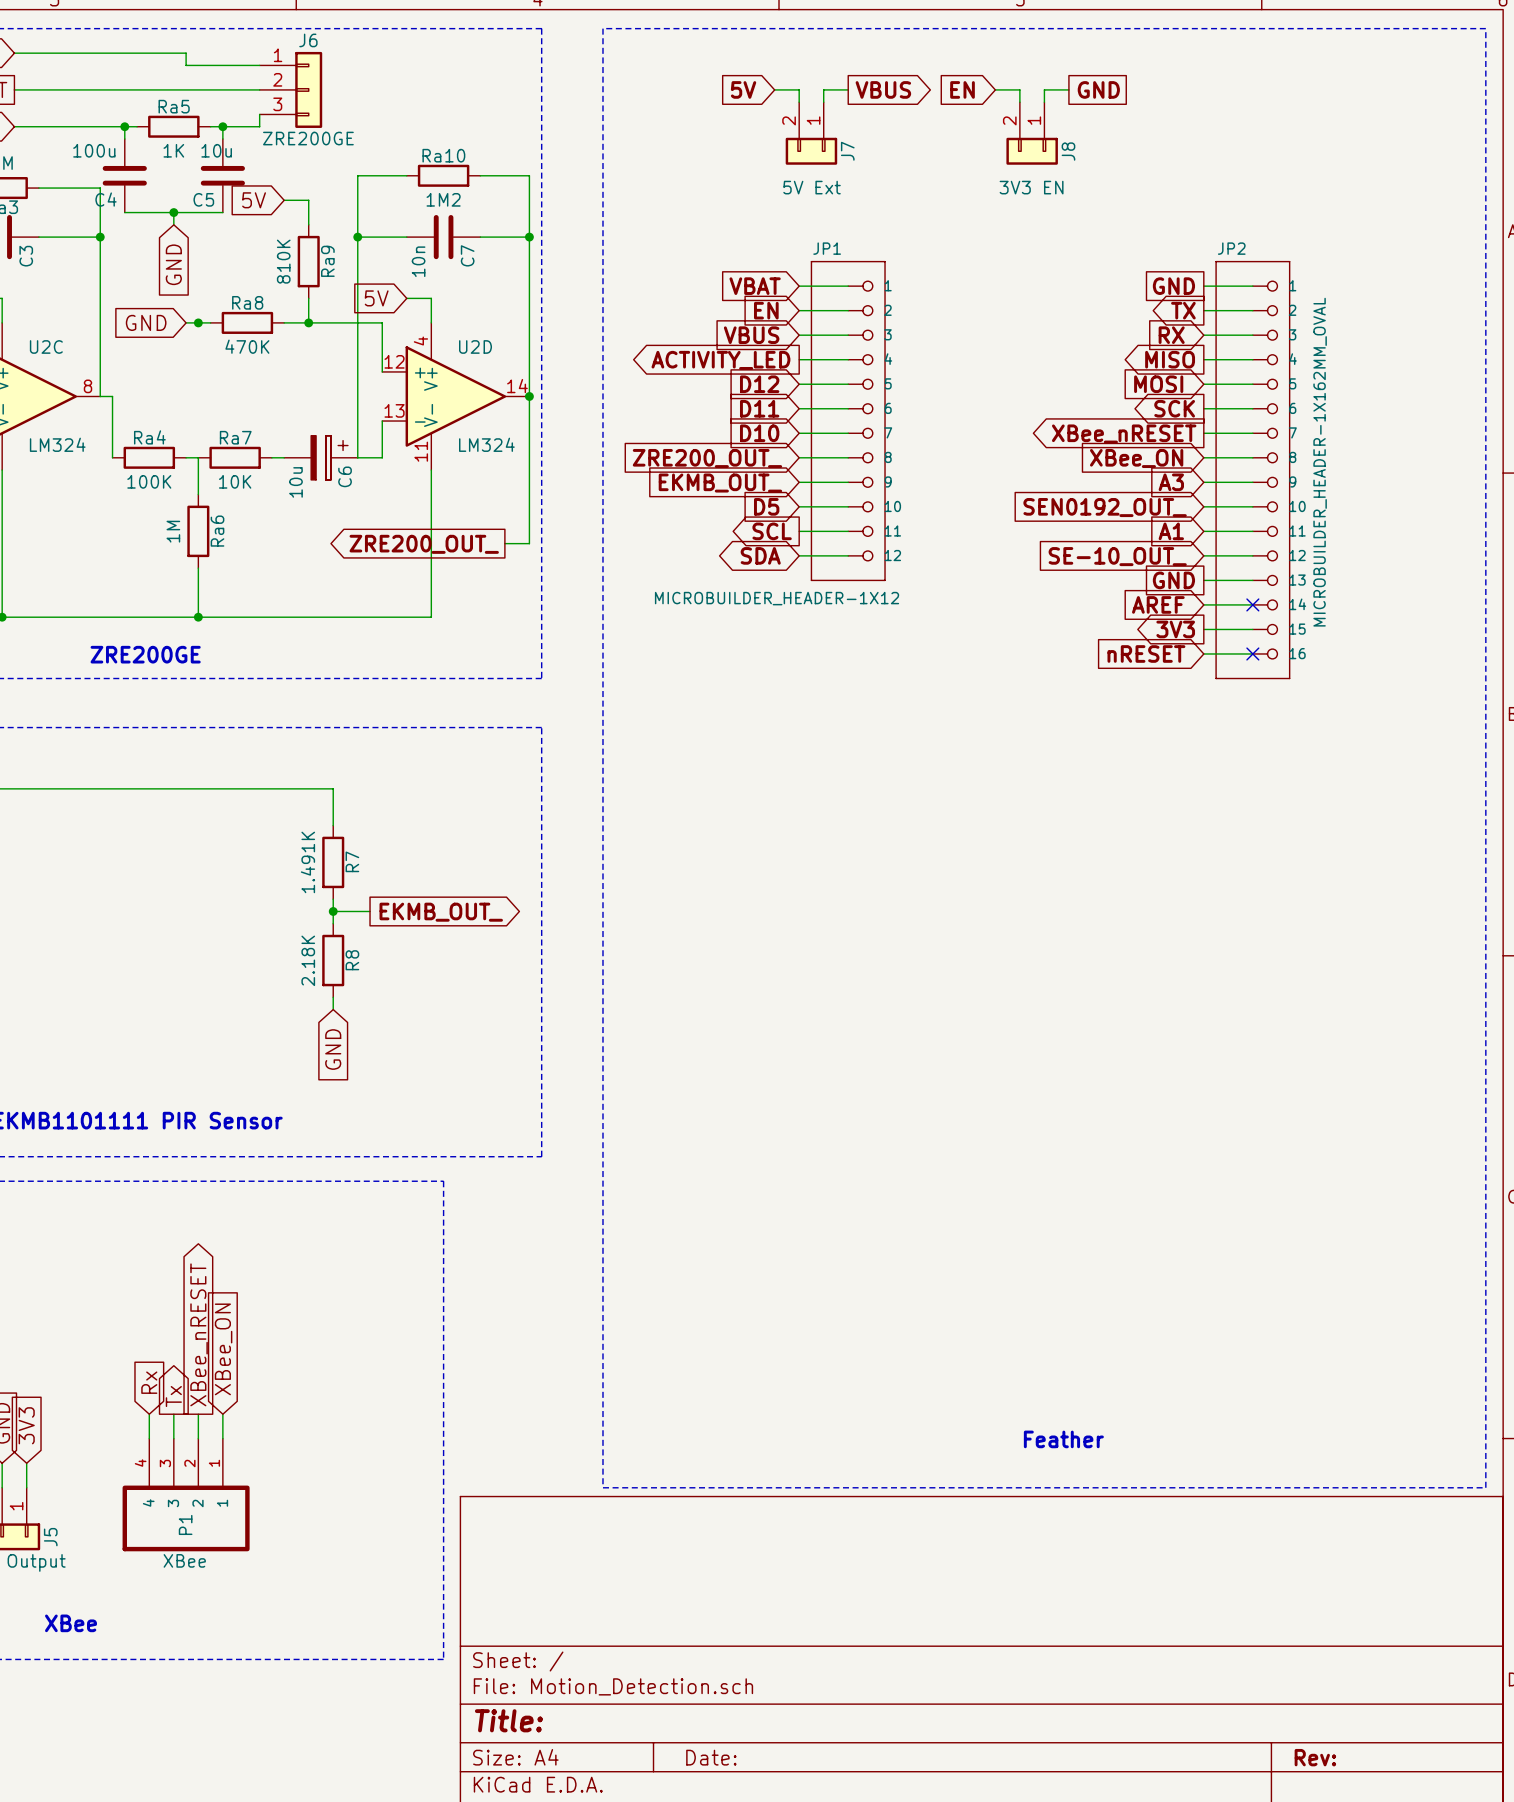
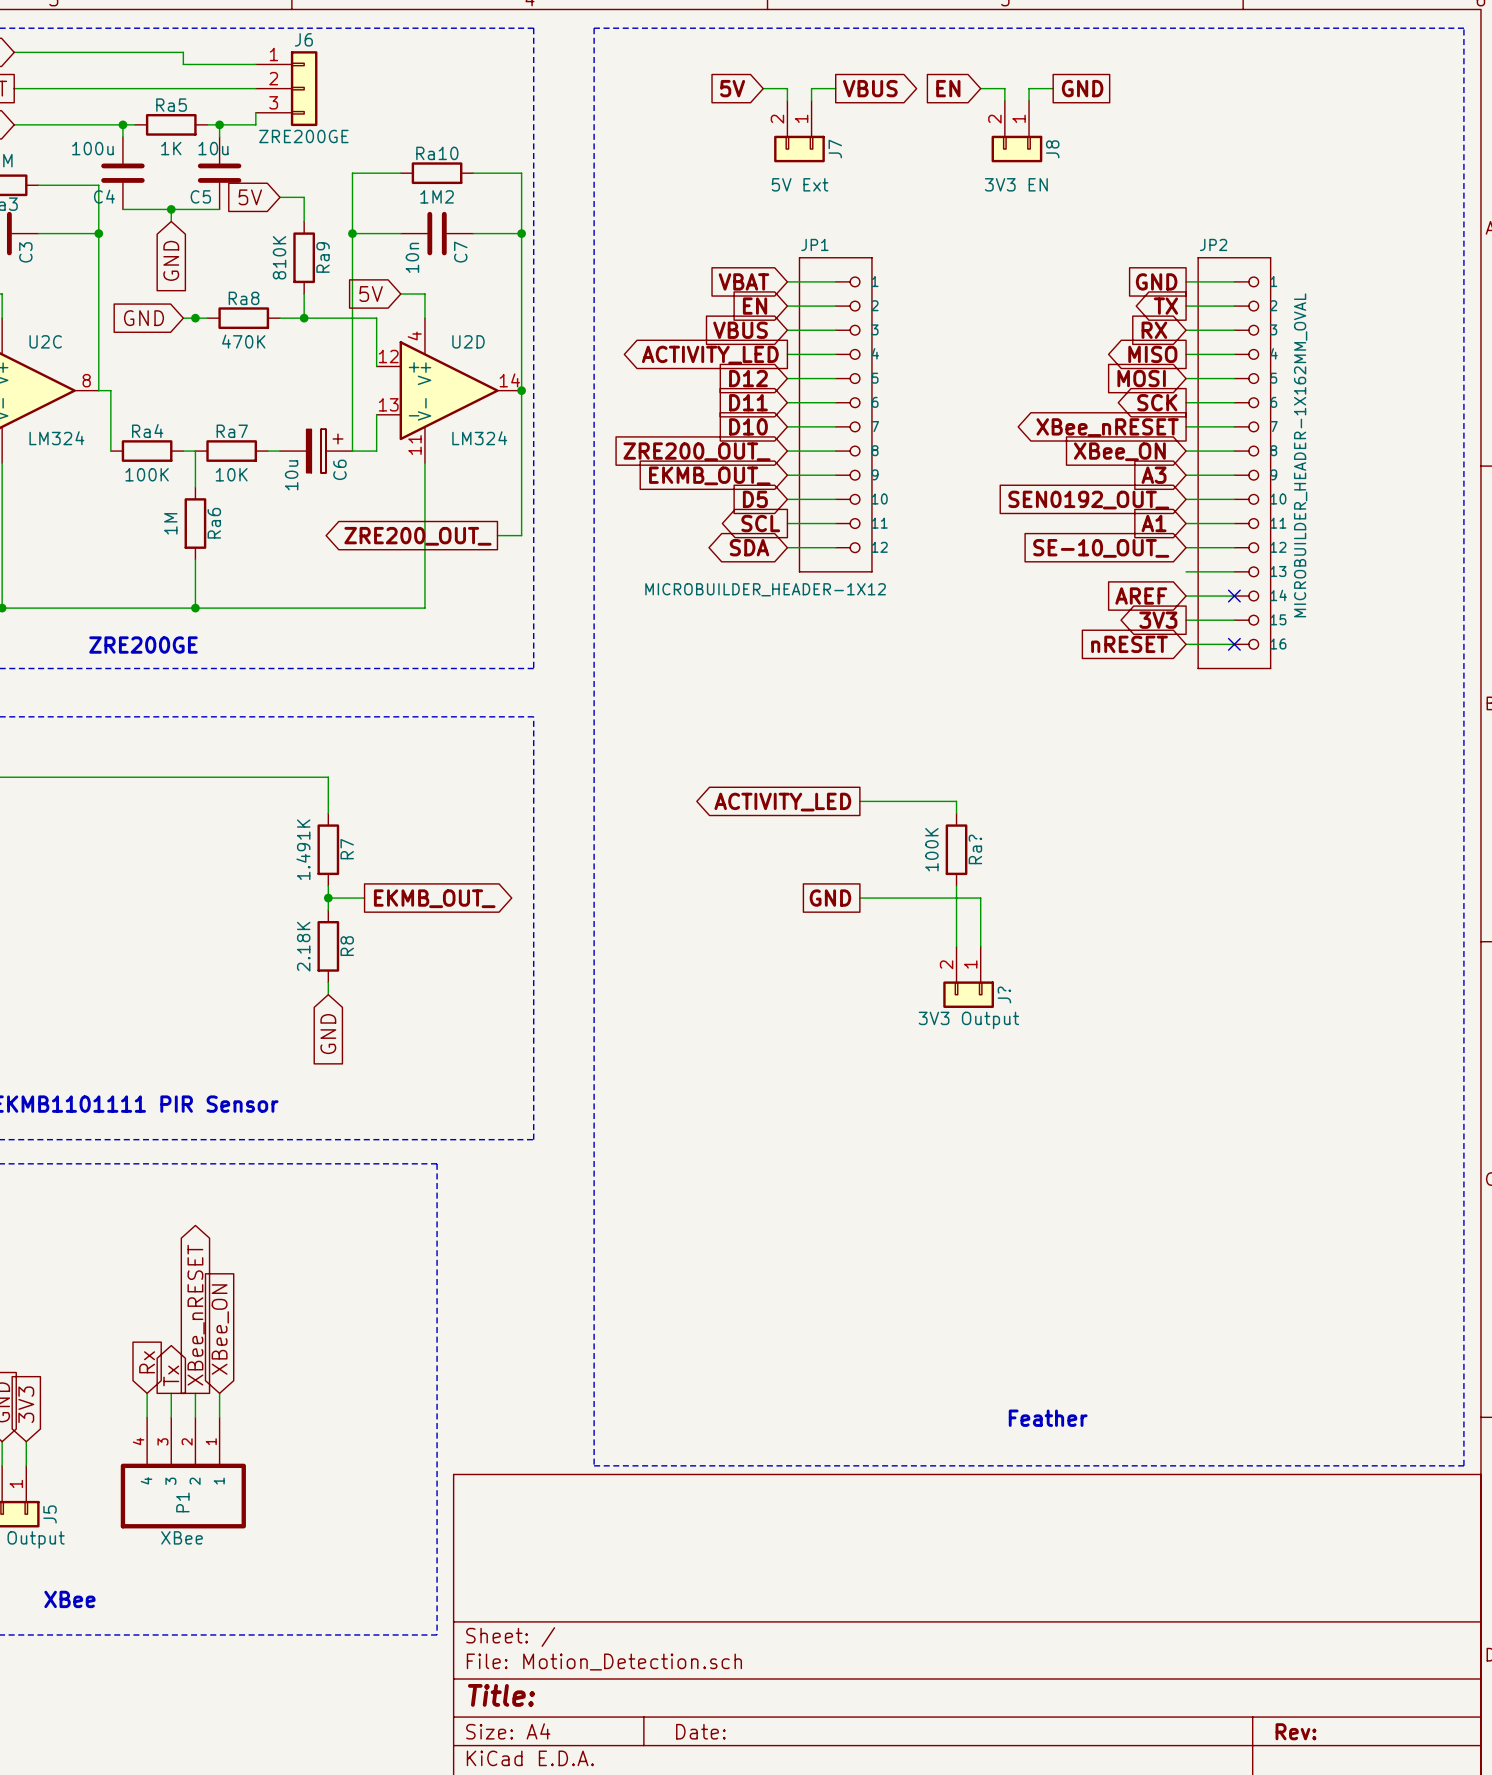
global label: GND (1173, 580) -> none
wire: none -> (859, 801) (956, 801) (956, 813)
global label: none -> ACTIVITY_LED (782, 802)
Ra?: none -> 100K (956, 849)
wire: none -> (956, 885) (956, 946)
global label: none -> GND (830, 898)
wire: none -> (859, 898) (980, 898) (980, 946)
J?: none -> 3V3 Output (968, 977)

